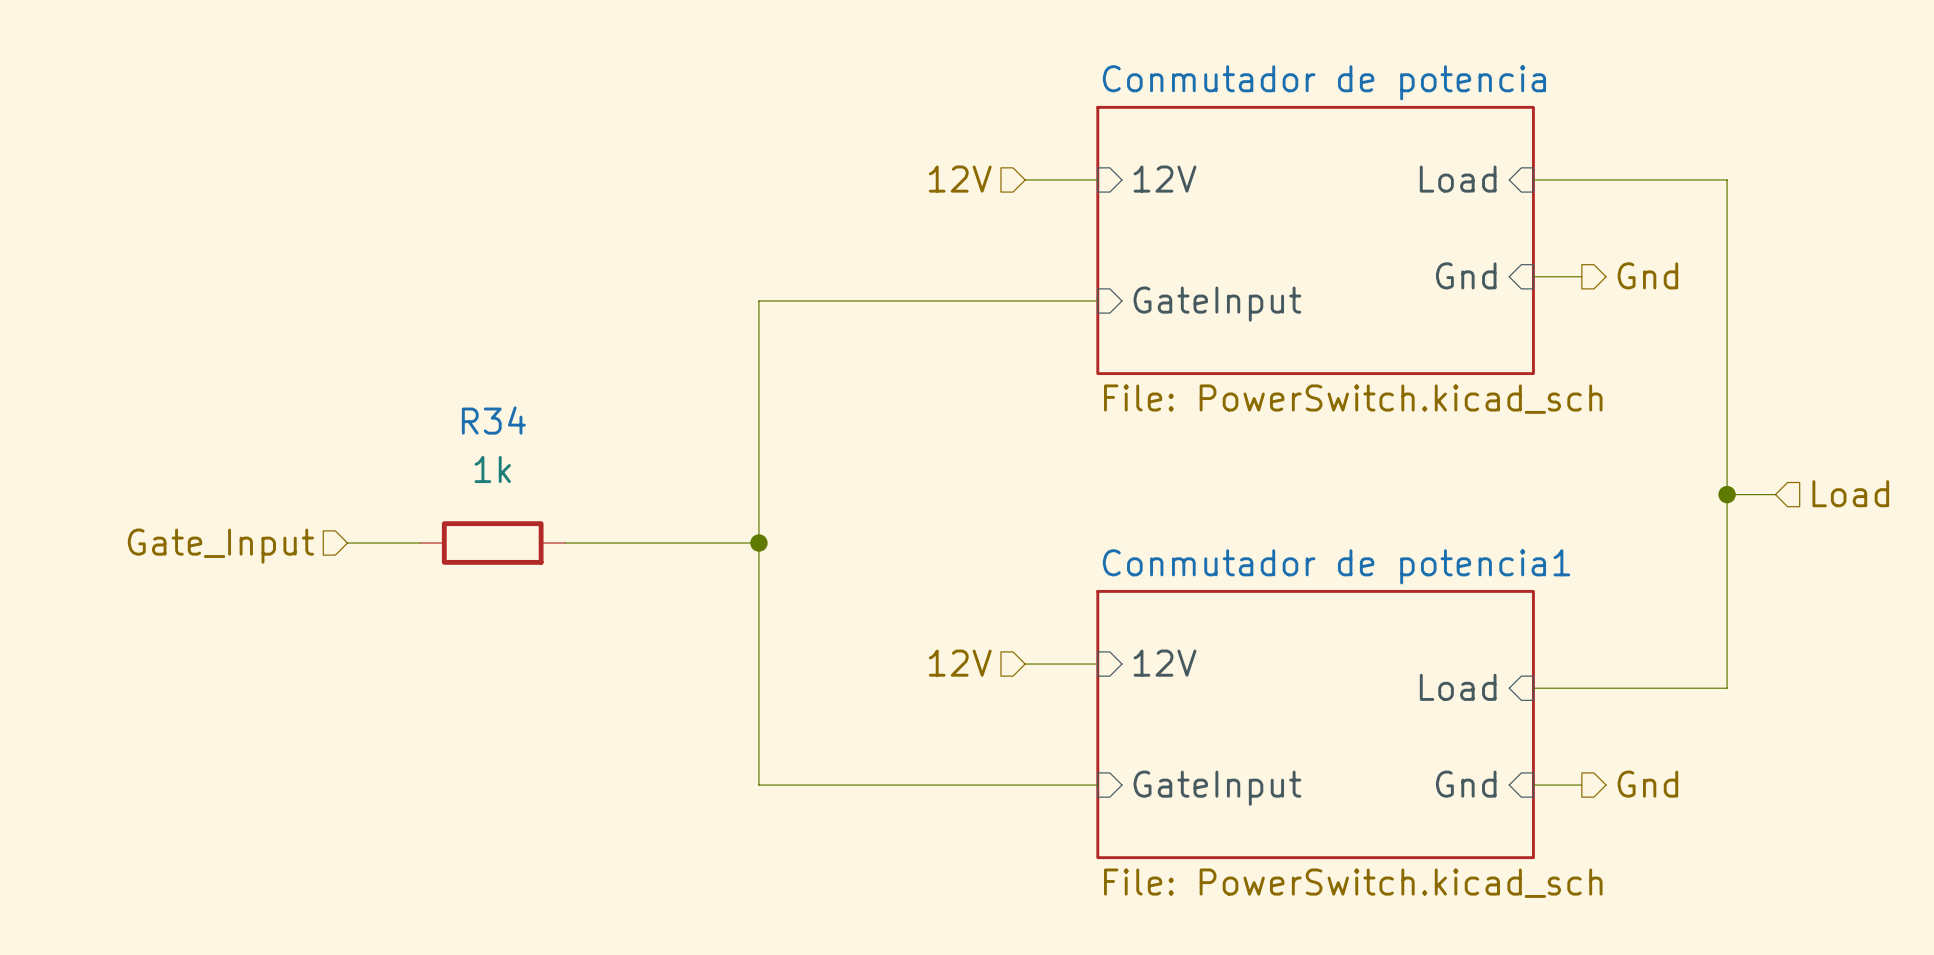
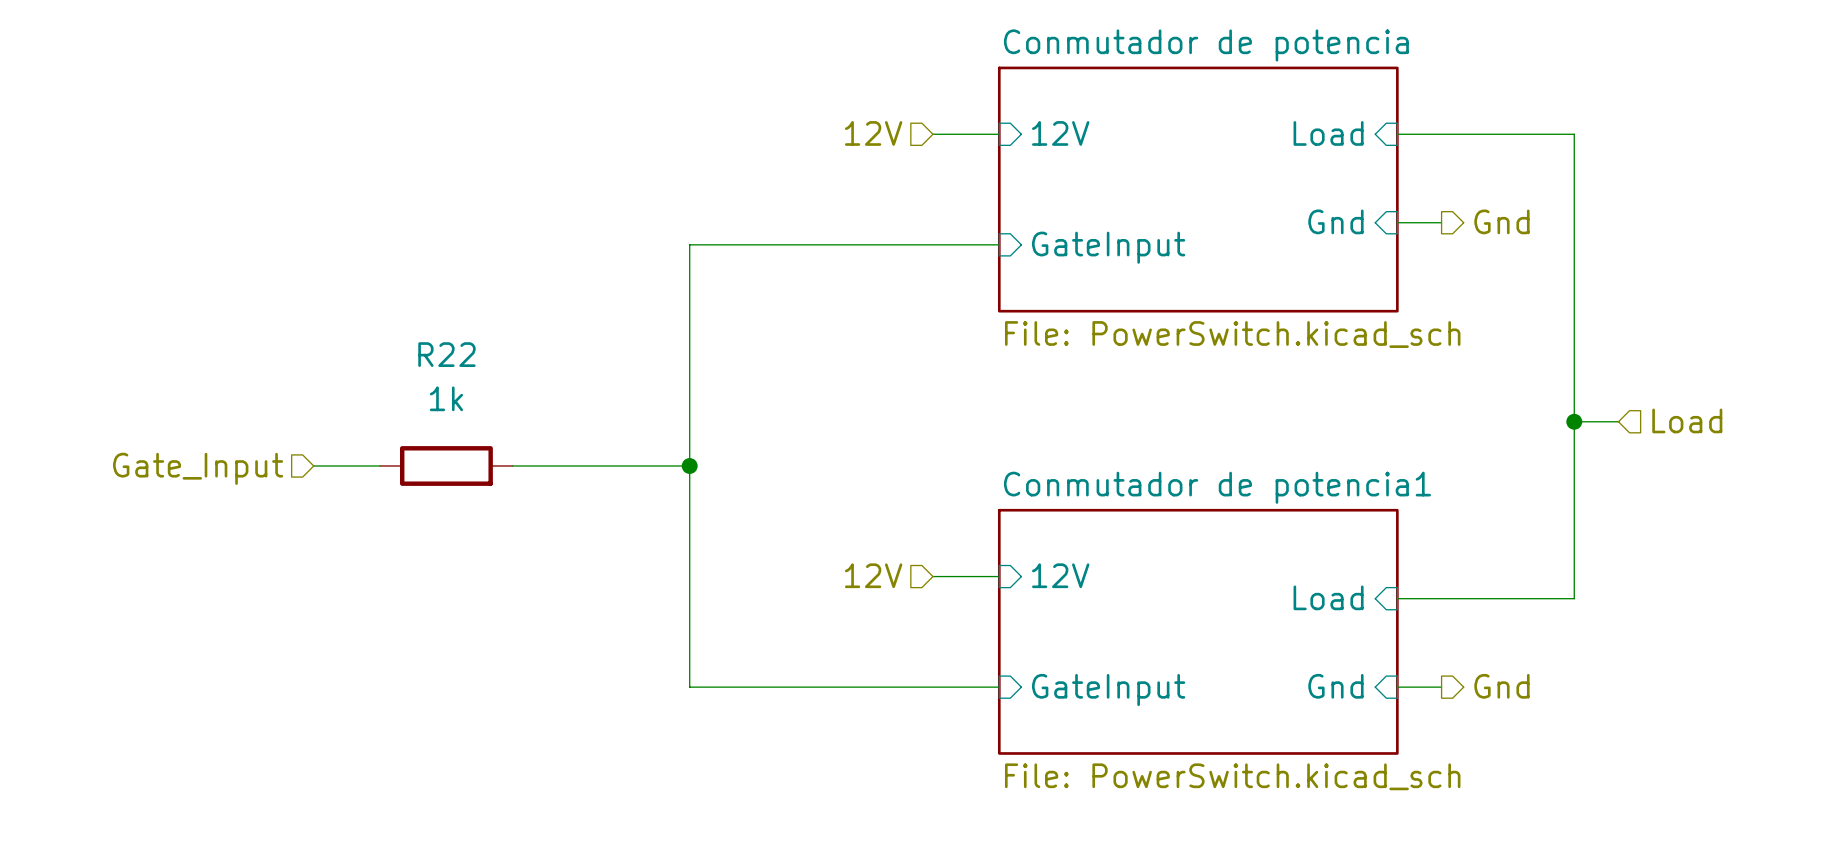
R34 name: R34 (493, 420) -> R22 (446, 354)

